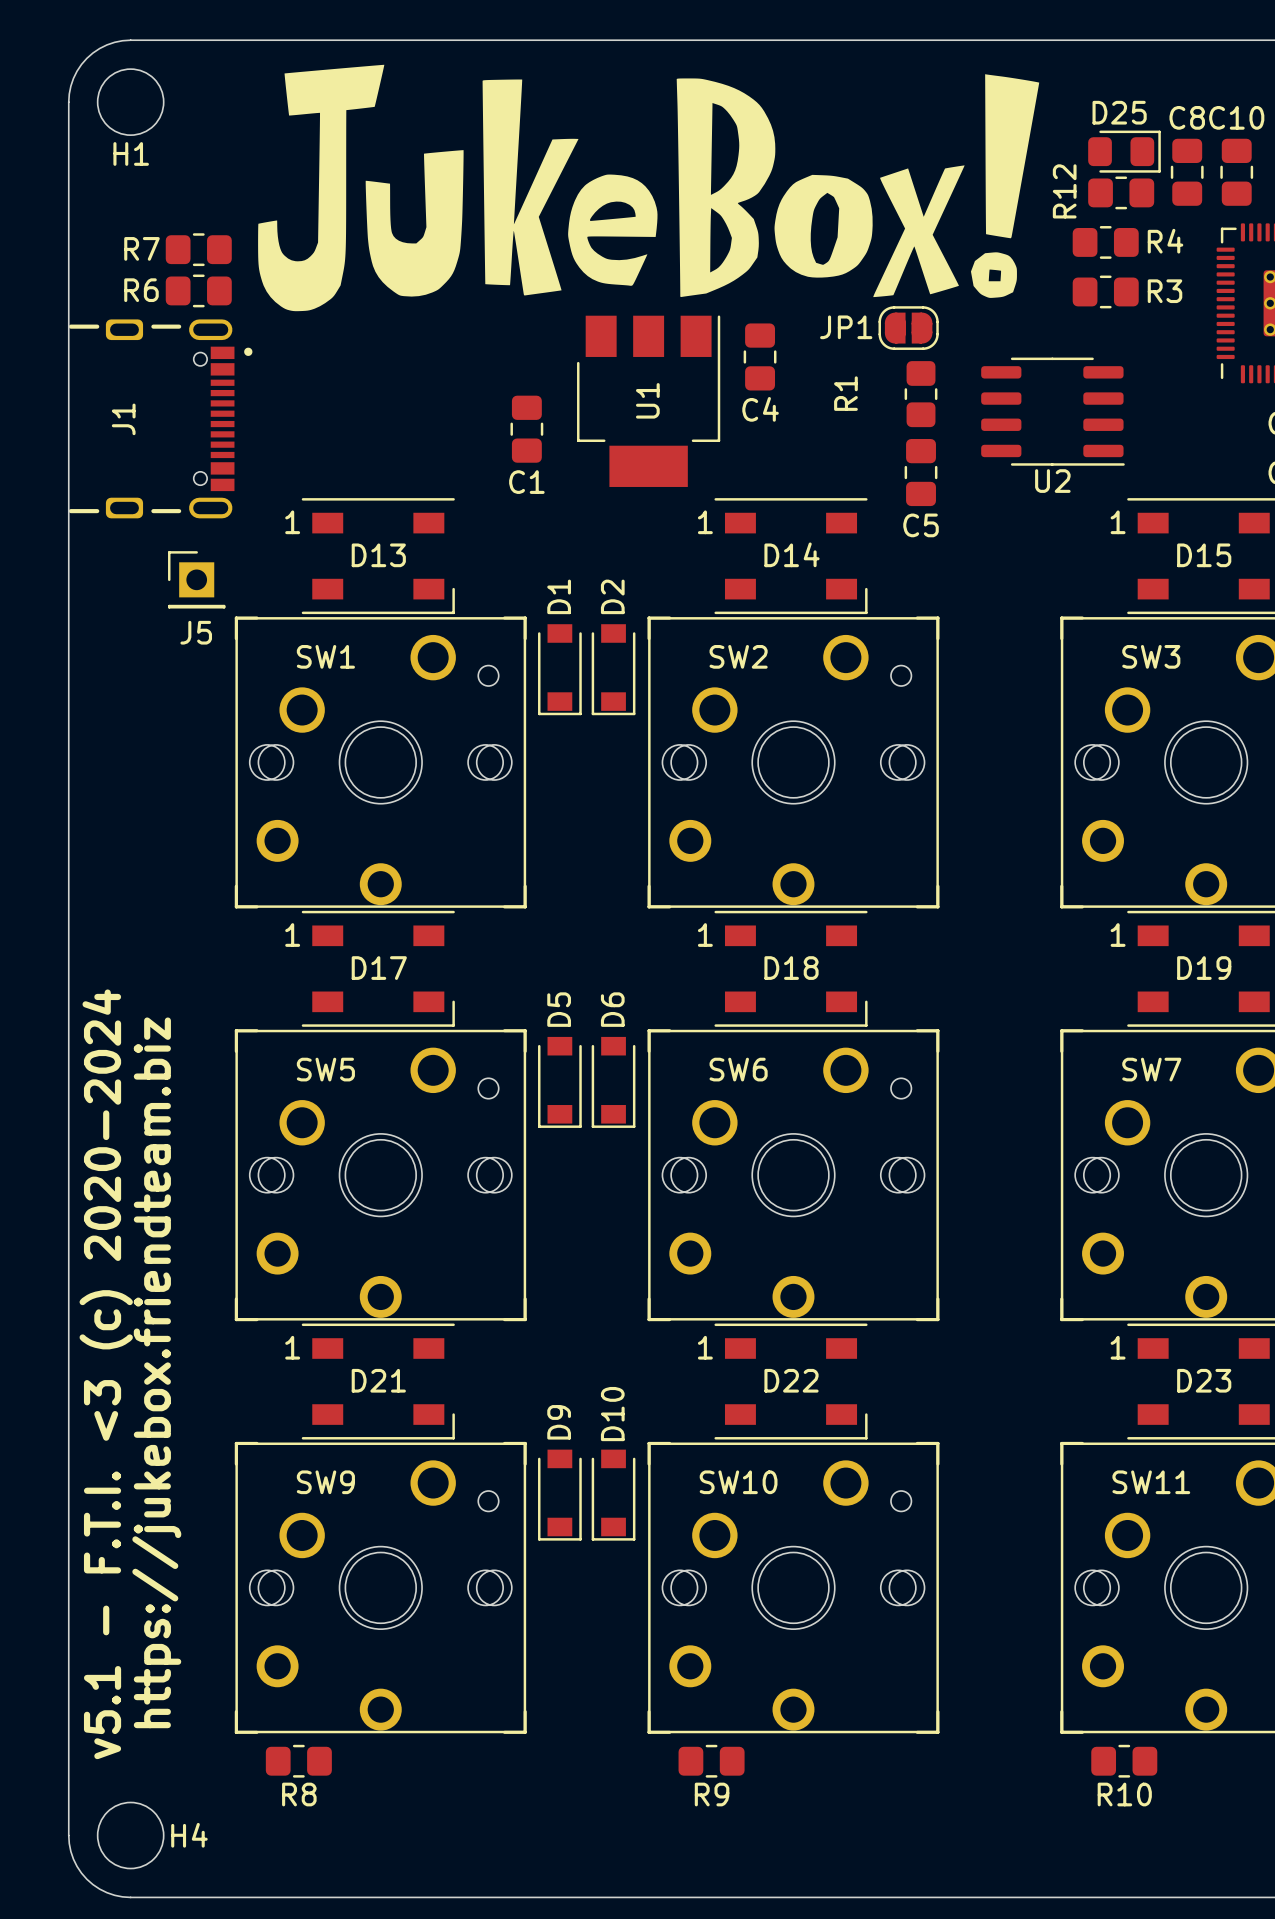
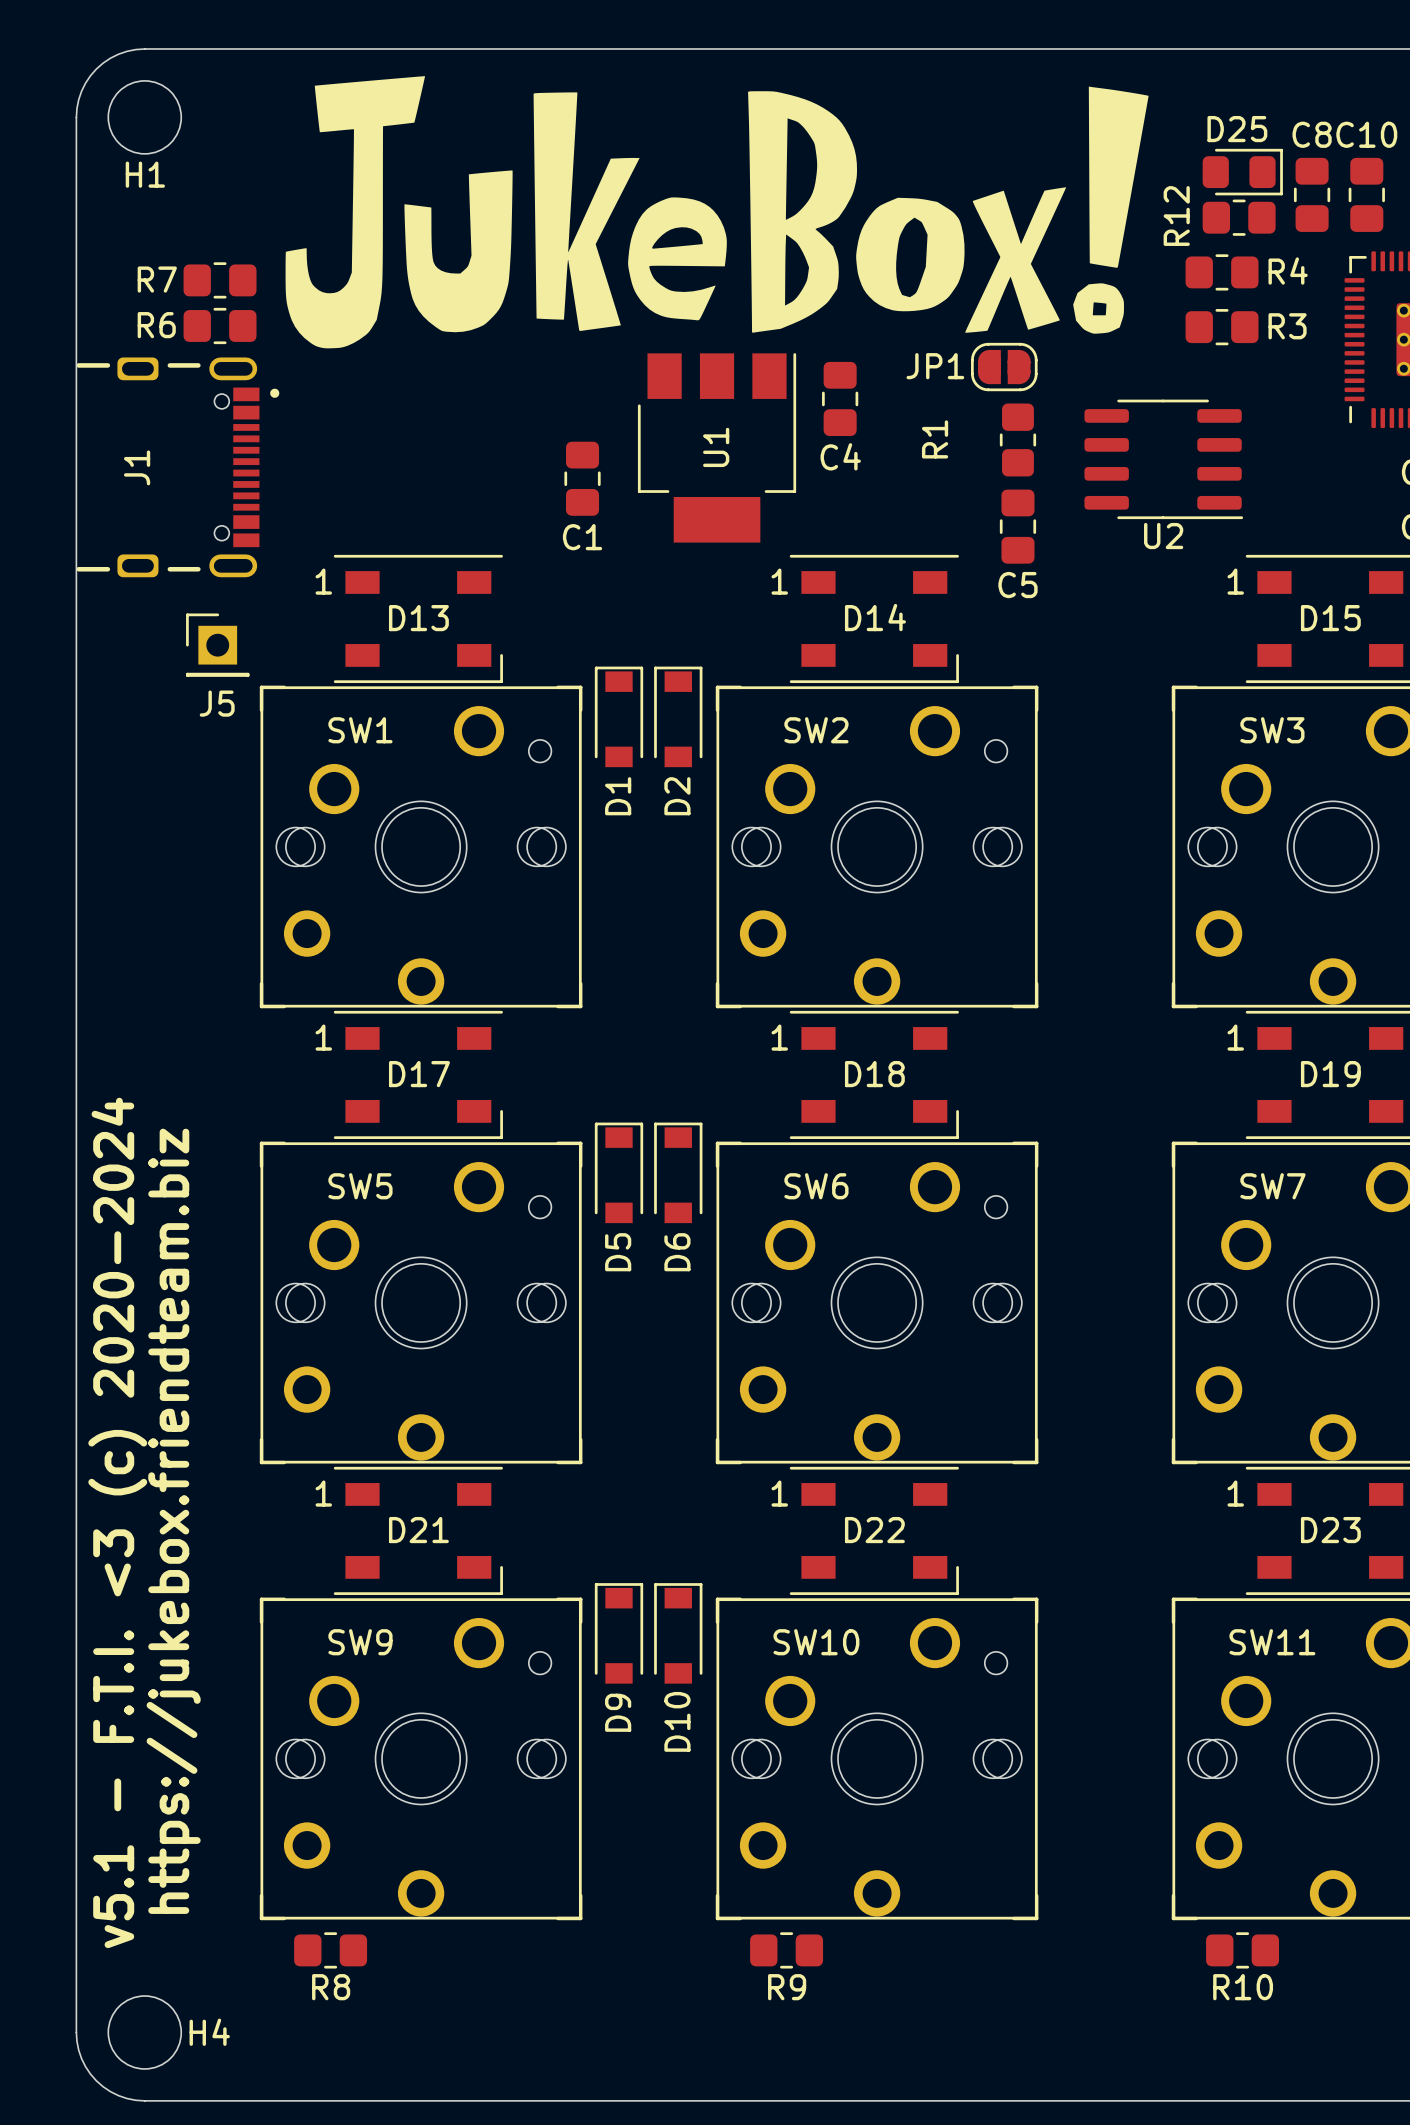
D1 rotation: 0° (559, 669) -> 180° (619, 716)
D2 rotation: 0° (613, 669) -> 180° (678, 716)
D5 rotation: 0° (559, 1082) -> 180° (619, 1172)
D6 rotation: 0° (613, 1082) -> 180° (678, 1172)
D9 rotation: 0° (559, 1495) -> 180° (619, 1633)
D10 rotation: 0° (613, 1495) -> 180° (678, 1633)

